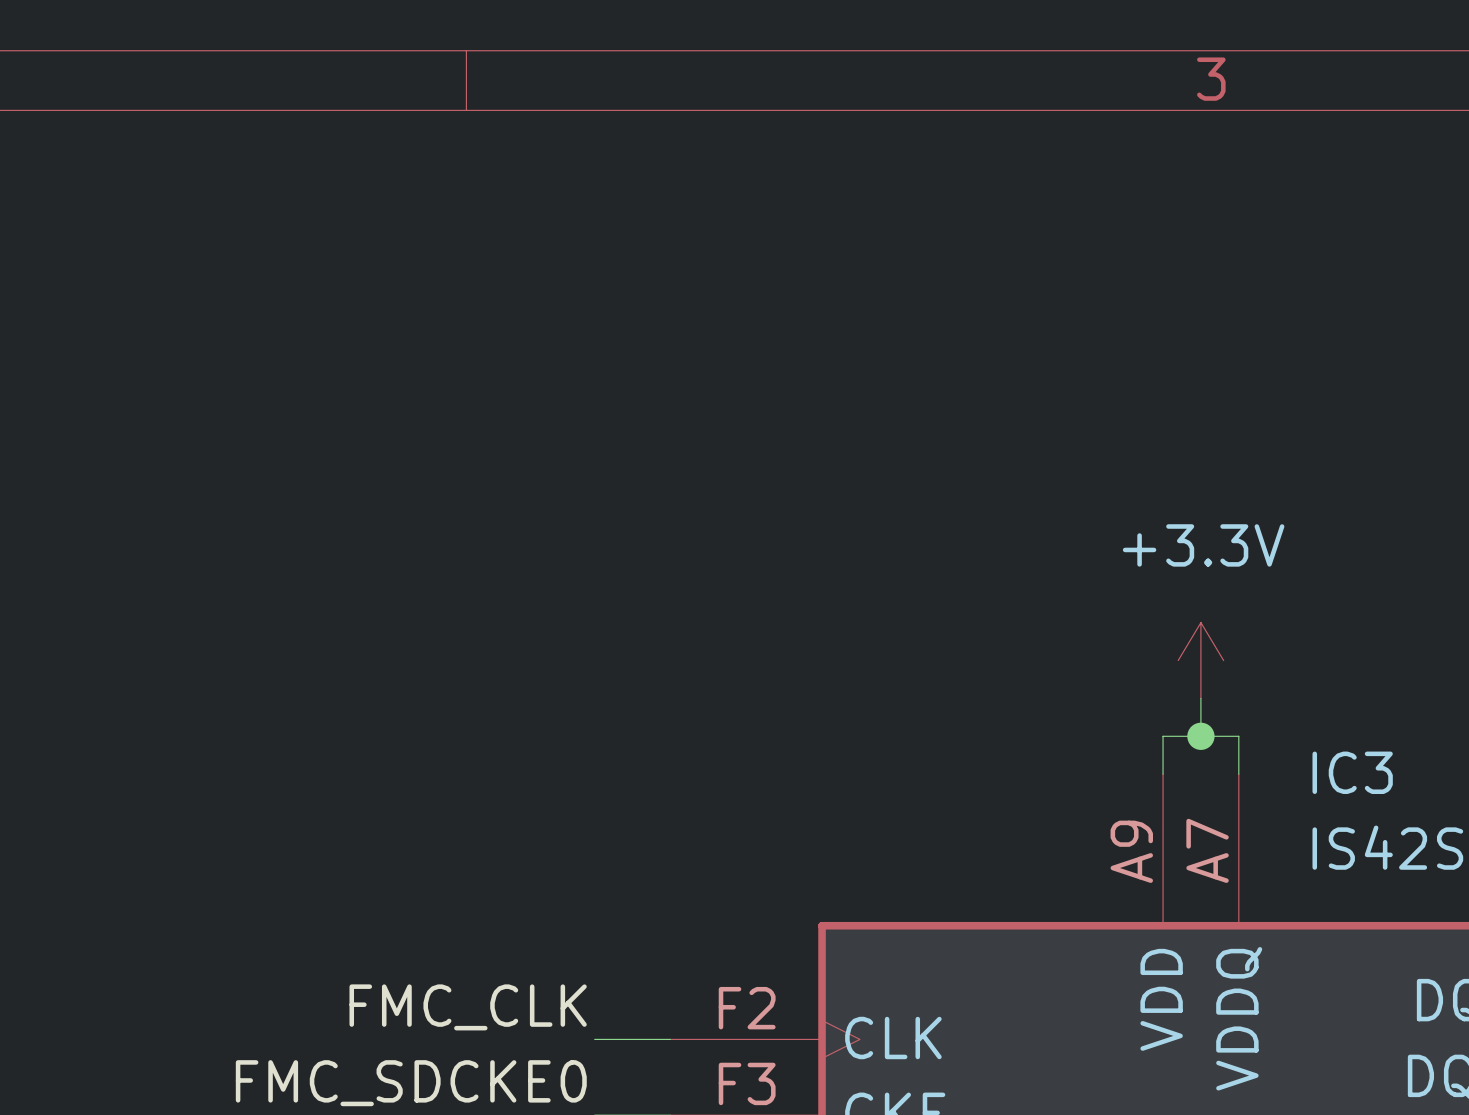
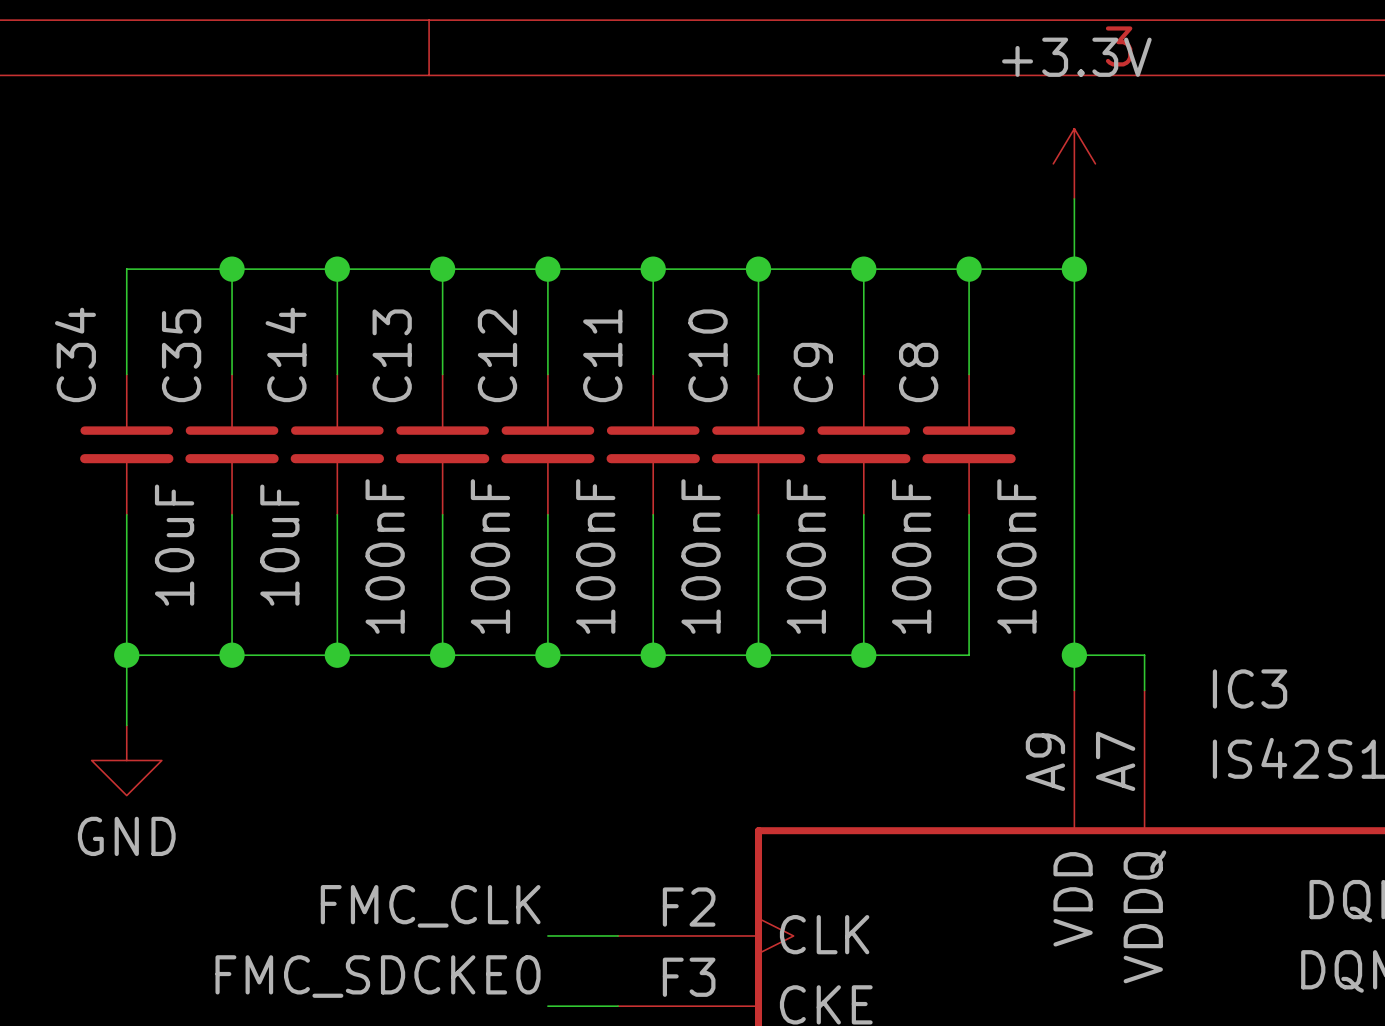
wire: none -> (1074, 198) (1074, 655)
wire: none -> (232, 269) (232, 374)
junction: none -> (232, 269)
wire: none -> (337, 269) (337, 374)
junction: none -> (337, 269)
wire: none -> (442, 269) (442, 374)
junction: none -> (442, 269)
wire: none -> (547, 269) (547, 374)
junction: none -> (547, 269)
wire: none -> (653, 269) (653, 374)
junction: none -> (653, 269)
wire: none -> (758, 269) (758, 374)
junction: none -> (758, 269)
wire: none -> (863, 269) (863, 374)
junction: none -> (863, 269)
wire: none -> (969, 269) (969, 374)
junction: none -> (969, 269)
wire: none -> (1074, 269) (126, 269) (126, 374)
junction: none -> (1074, 269)
C34: none -> 10uF (126, 444)
C35: none -> 10uF (232, 444)
C14: none -> 100nF (337, 444)
C13: none -> 100nF (442, 444)
C12: none -> 100nF (547, 444)
C11: none -> 100nF (653, 444)
C10: none -> 100nF (758, 444)
C9: none -> 100nF (863, 444)
C8: none -> 100nF (969, 444)
wire: none -> (126, 514) (126, 725)
wire: none -> (232, 514) (232, 655)
wire: none -> (337, 514) (337, 655)
wire: none -> (442, 514) (442, 655)
wire: none -> (547, 514) (547, 655)
wire: none -> (653, 514) (653, 655)
wire: none -> (758, 514) (758, 655)
wire: none -> (863, 514) (863, 655)
wire: none -> (969, 514) (969, 655) (126, 655)
power symbol position: +3.3V (1200, 660) -> +3.3V (1074, 163)
wire: (1200, 698) (1200, 736) -> none
junction: none -> (126, 655)
junction: none -> (232, 655)
junction: none -> (337, 655)
junction: none -> (442, 655)
junction: none -> (547, 655)
junction: none -> (653, 655)
junction: none -> (758, 655)
junction: none -> (863, 655)
junction position: (1200, 736) -> (1074, 655)
power symbol: none -> GND (126, 760)

